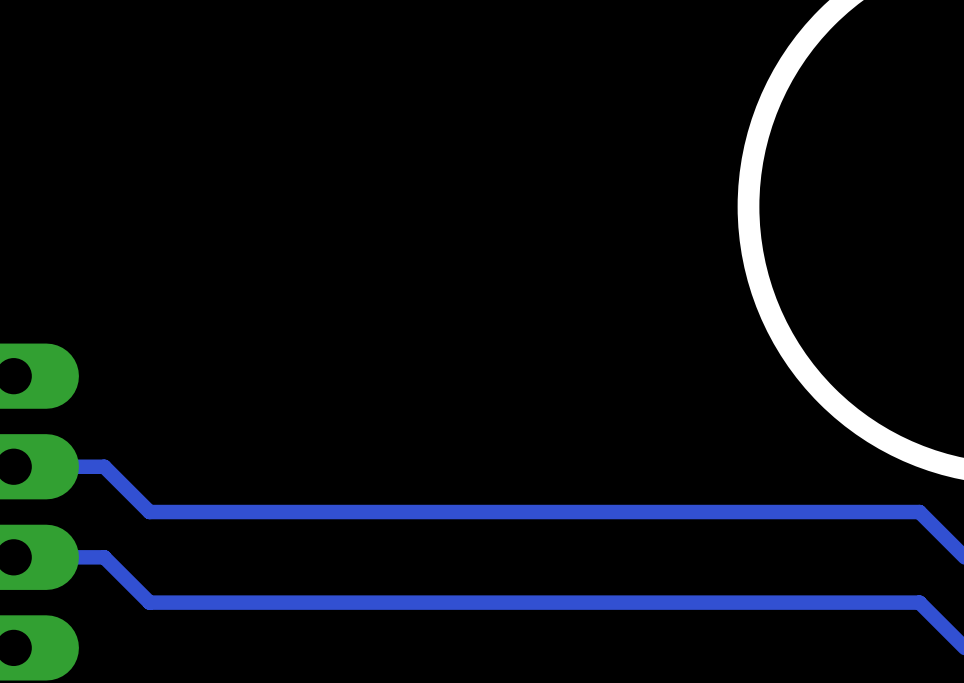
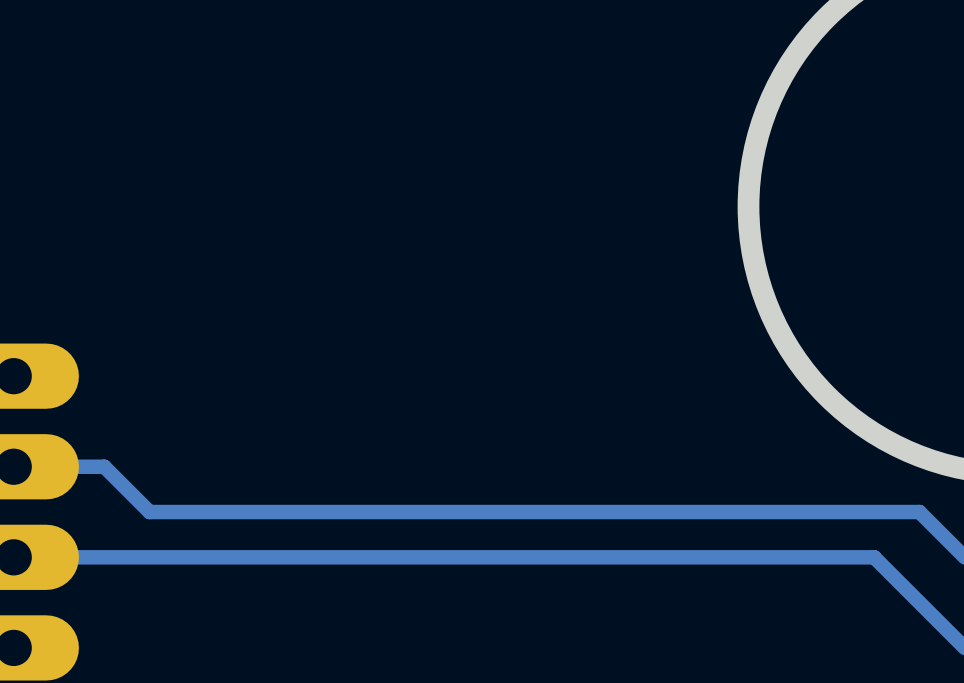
track: (104, 557) (149, 602) (919, 602) -> (104, 557) (874, 557) (919, 602)

